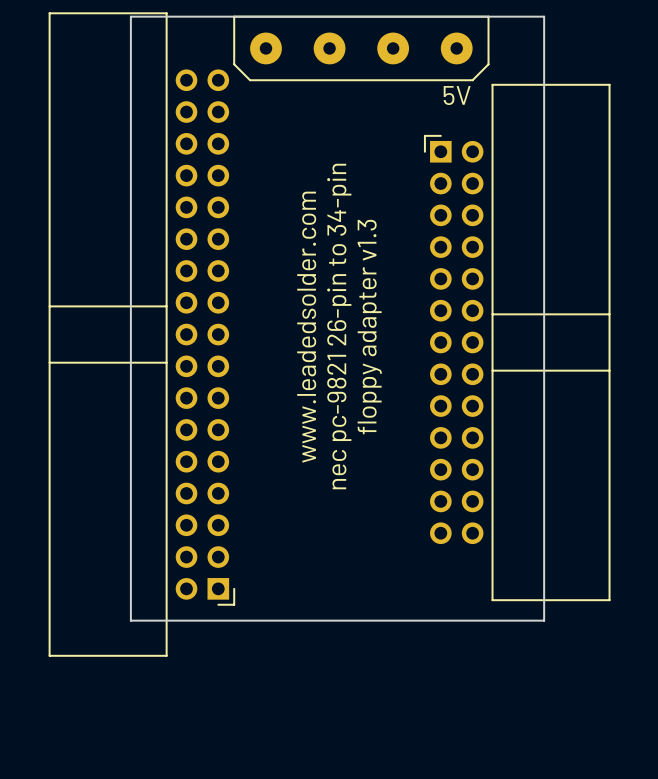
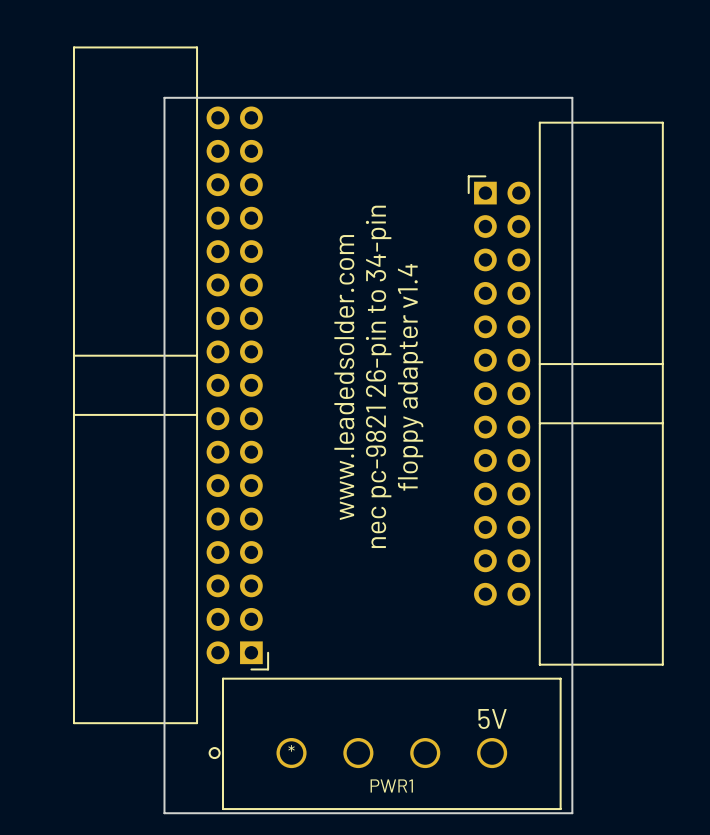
board edge: (130, 16) (544, 16) (544, 620) (130, 620) (130, 16) -> (164, 97) (164, 813) (572, 813) (572, 97) (164, 97)
part: (361, 48) -> none
text: 5V (457, 95) -> none
text: floppy adapter v1.3 (369, 327) -> floppy adapter v1.4 (410, 377)
text: none -> 5V (492, 718)
PWR1: none -> (385, 743)

